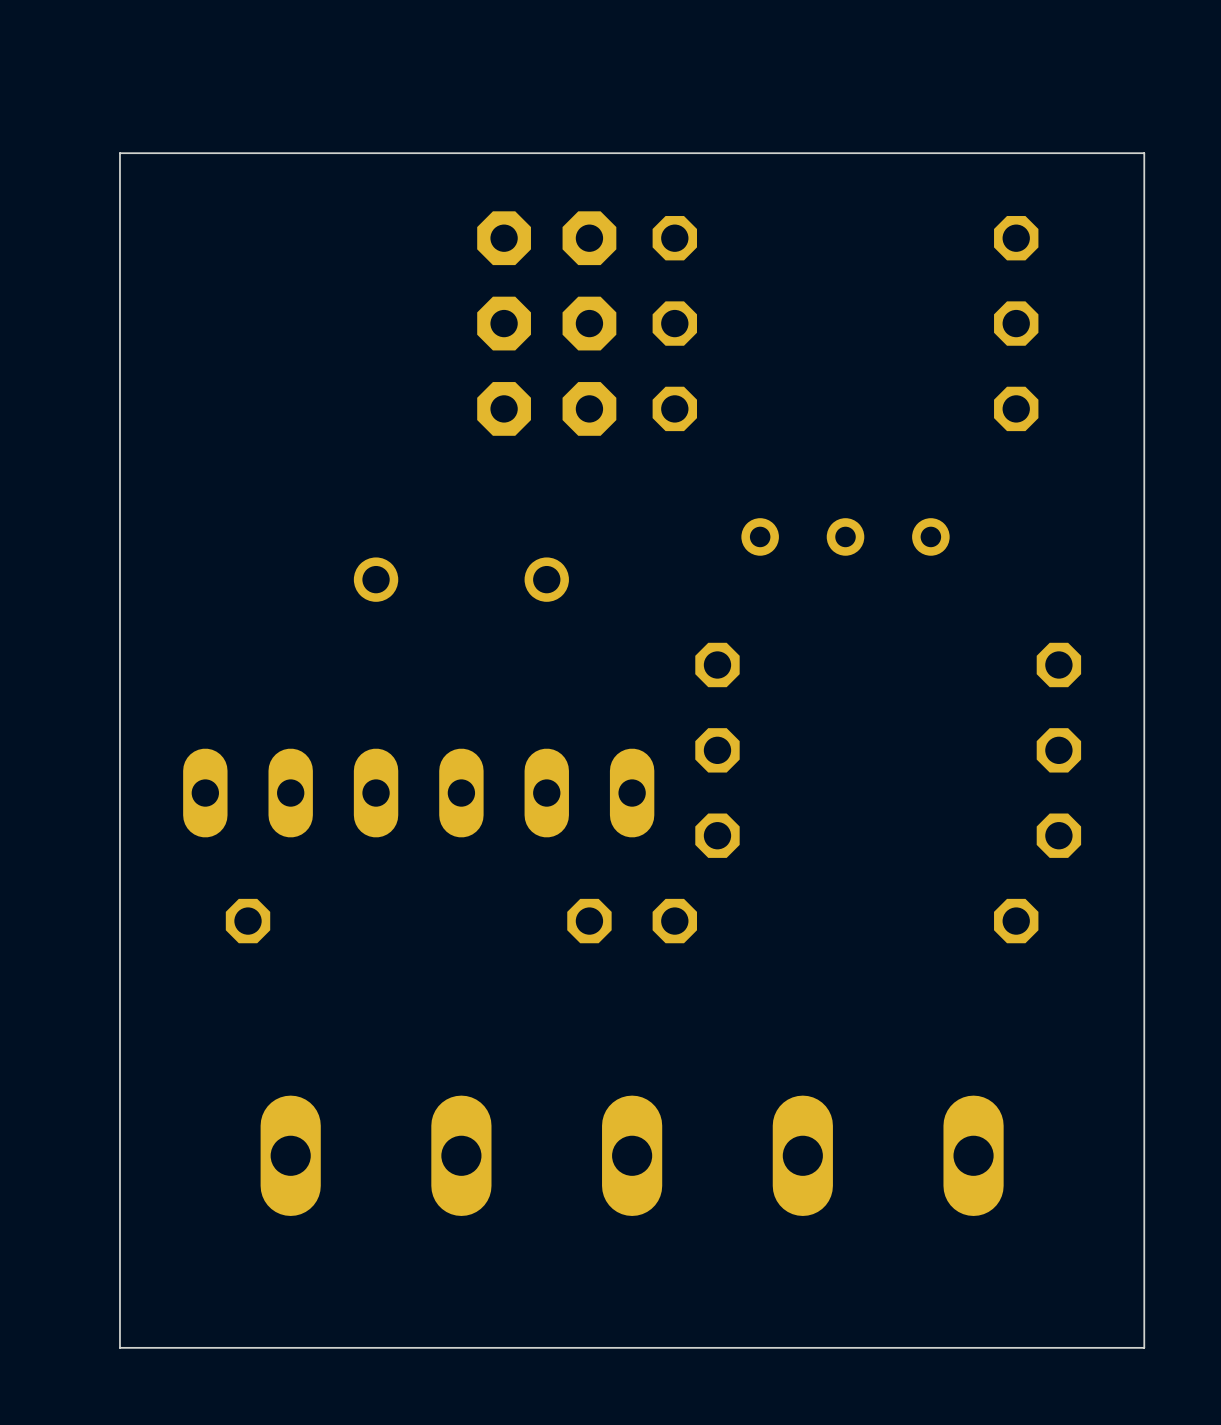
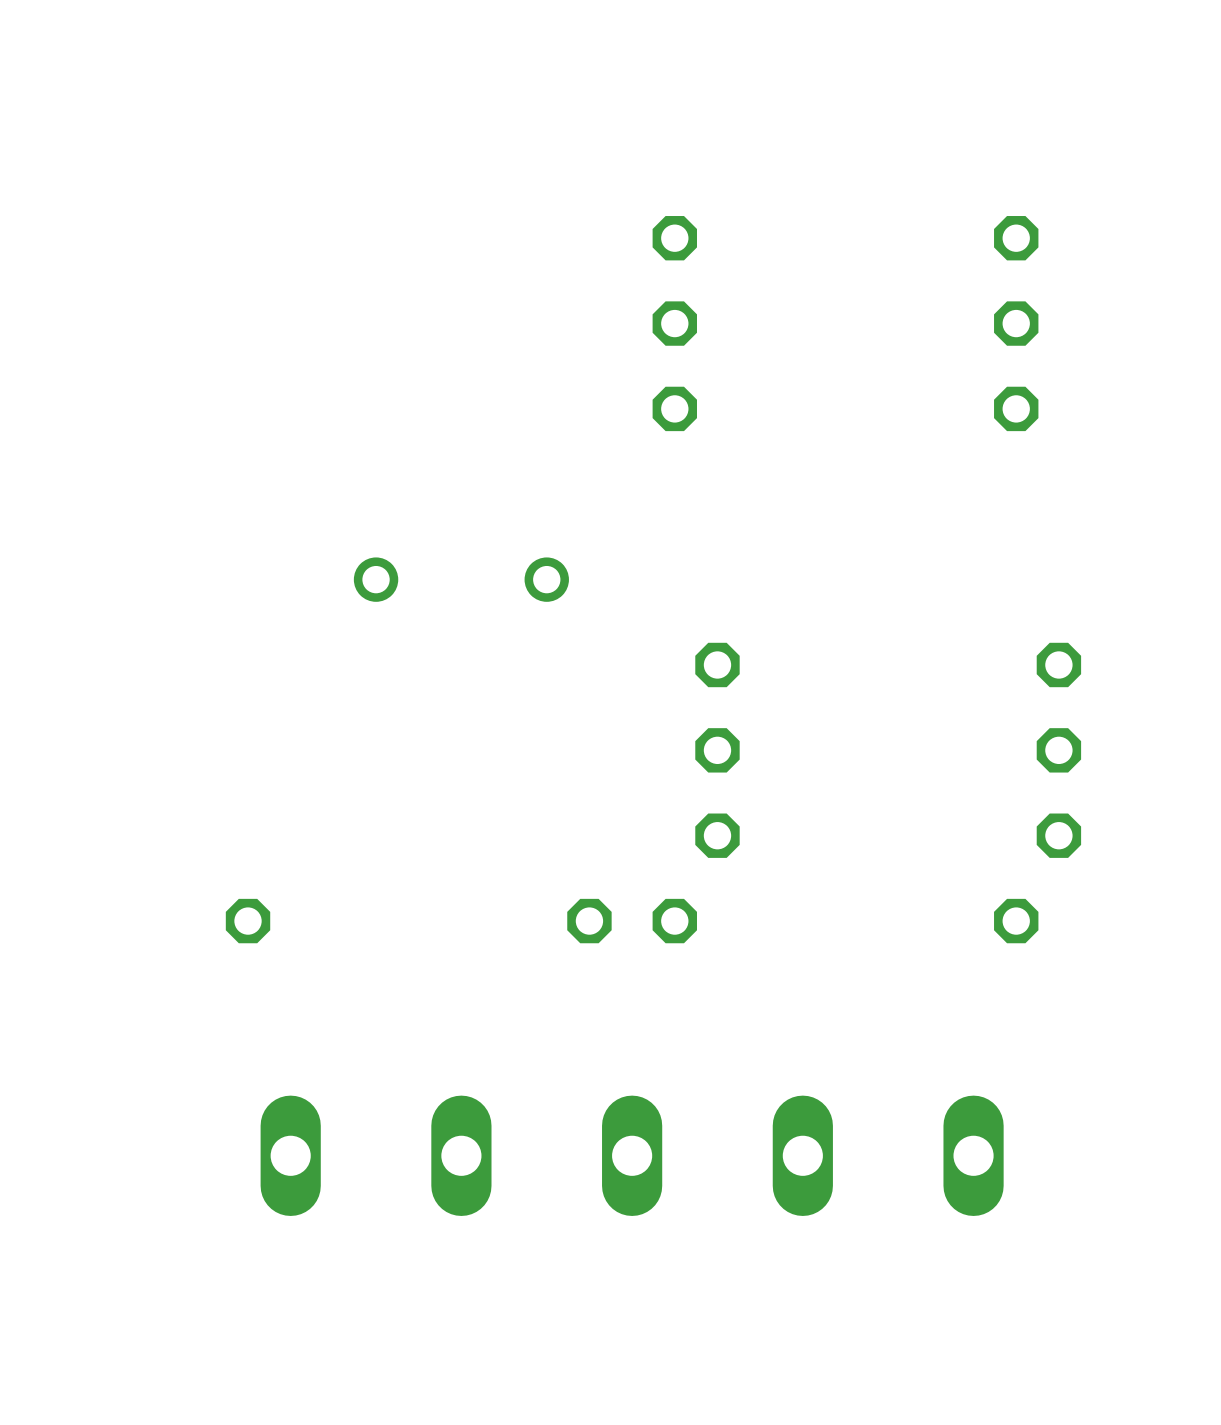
board edge: (1144, 153) (119, 153) (119, 1347) (1144, 1347) (1144, 153) -> none
part: (546, 238) -> none
part: (546, 323) -> none
part: (546, 408) -> none
part: (845, 536) -> none
part: (290, 793) -> none
part: (546, 793) -> none

